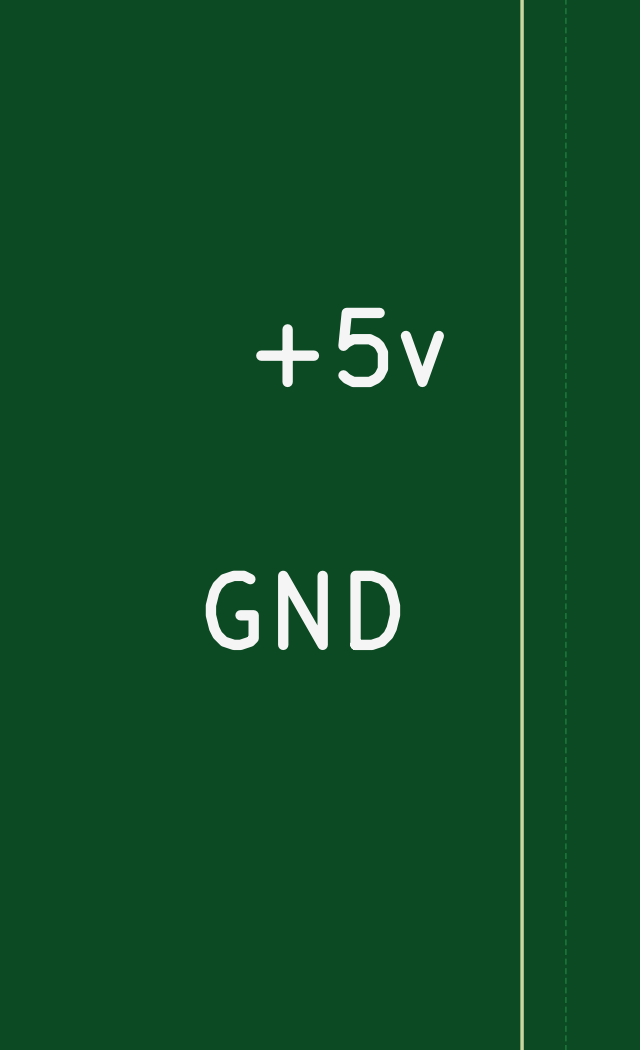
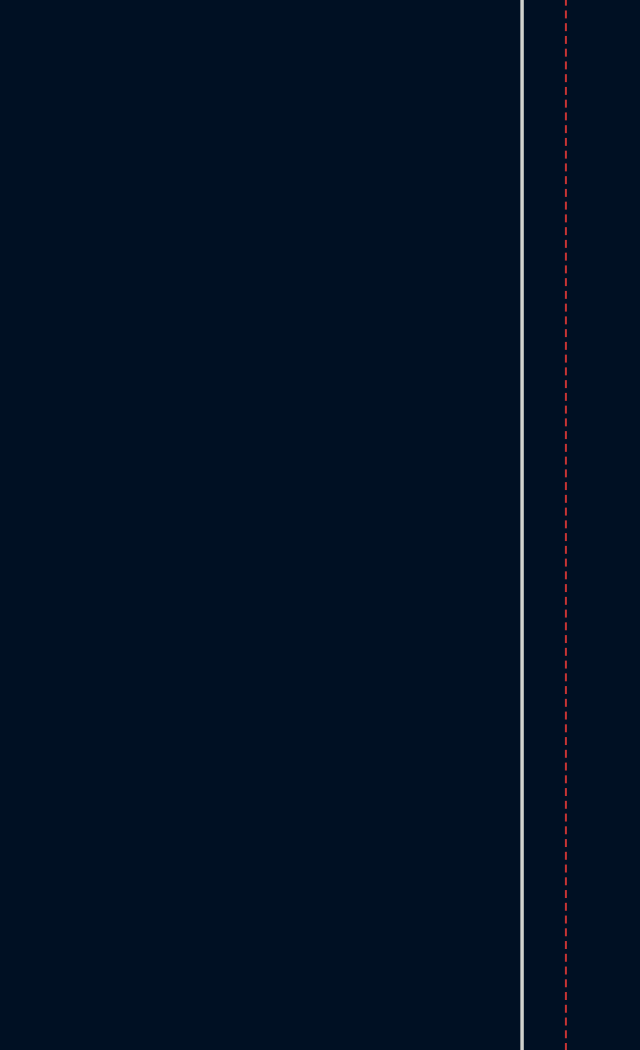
text: +5v (350, 347) -> none
text: GND (302, 610) -> none

